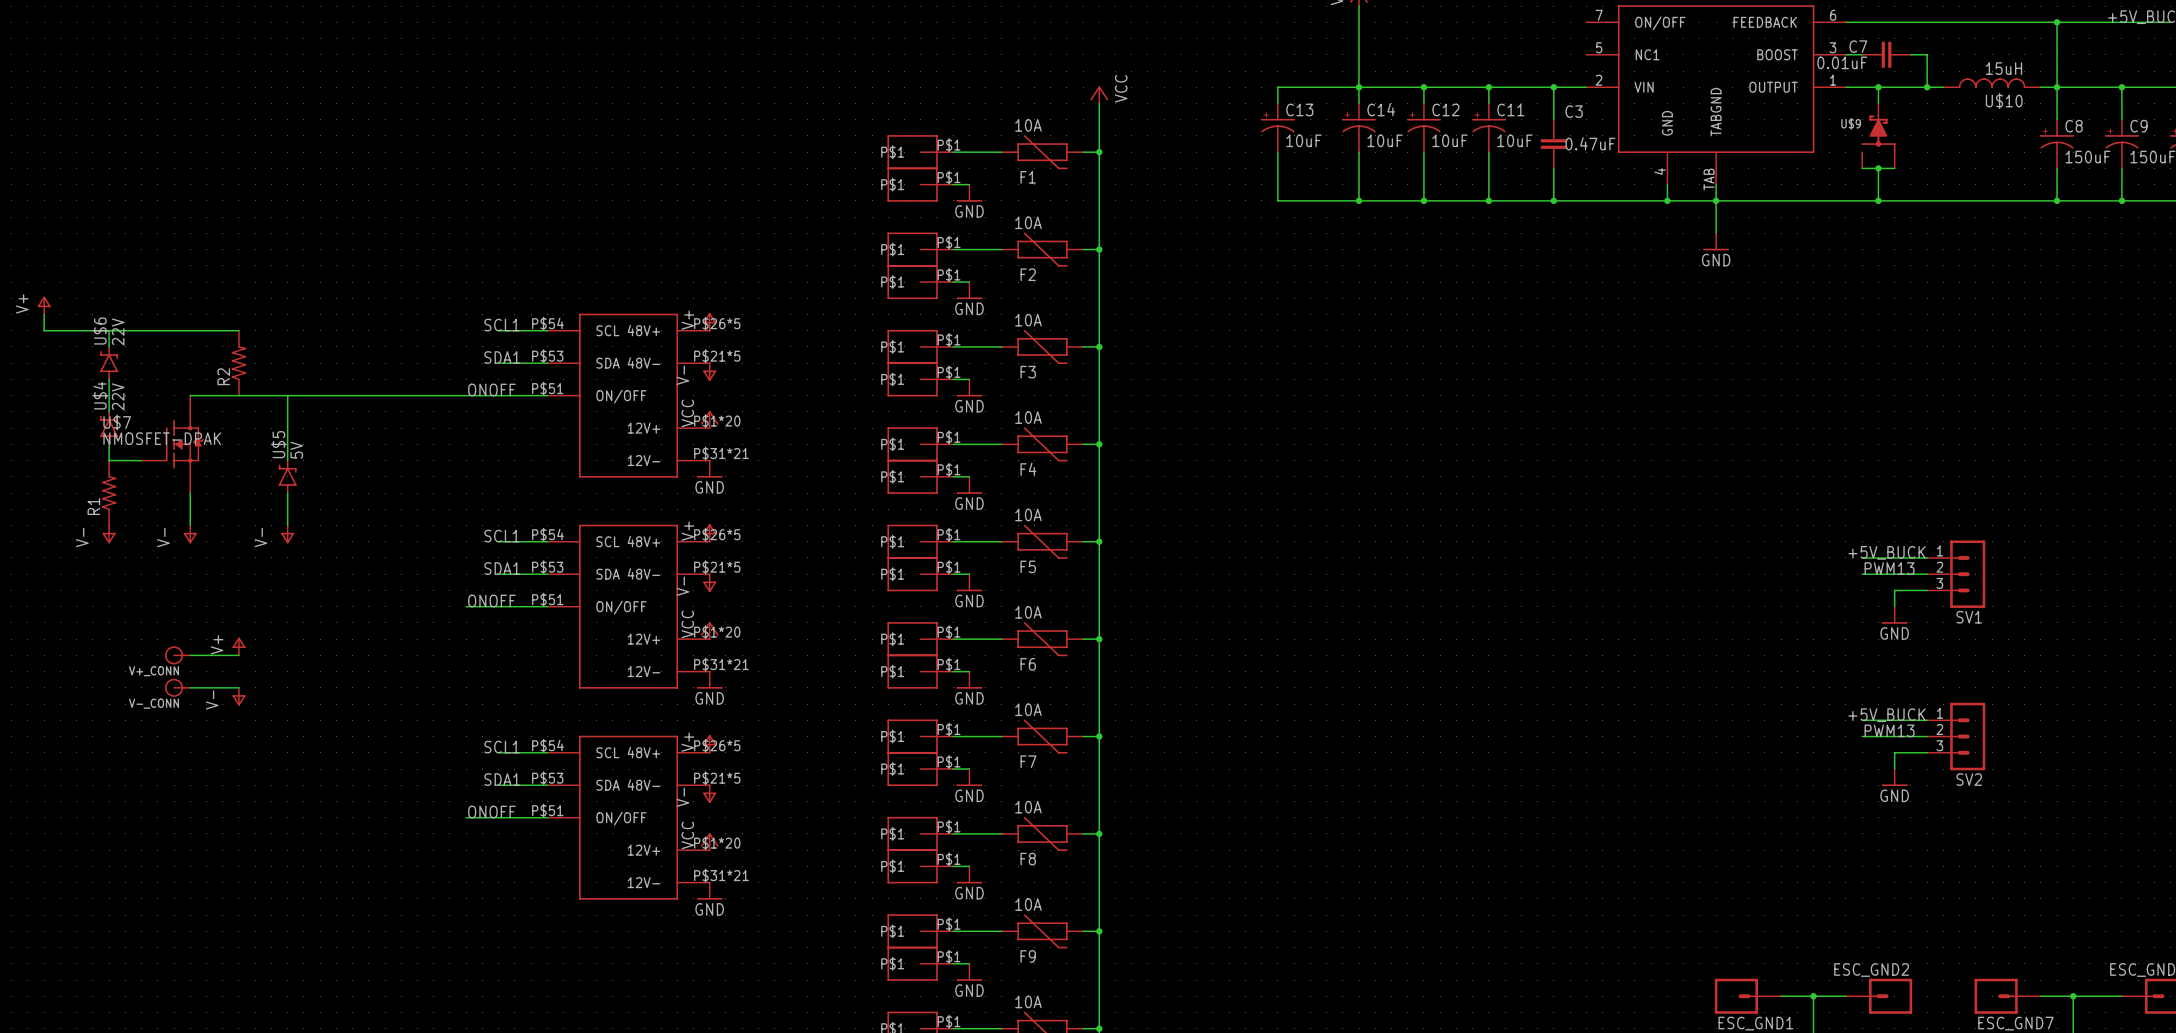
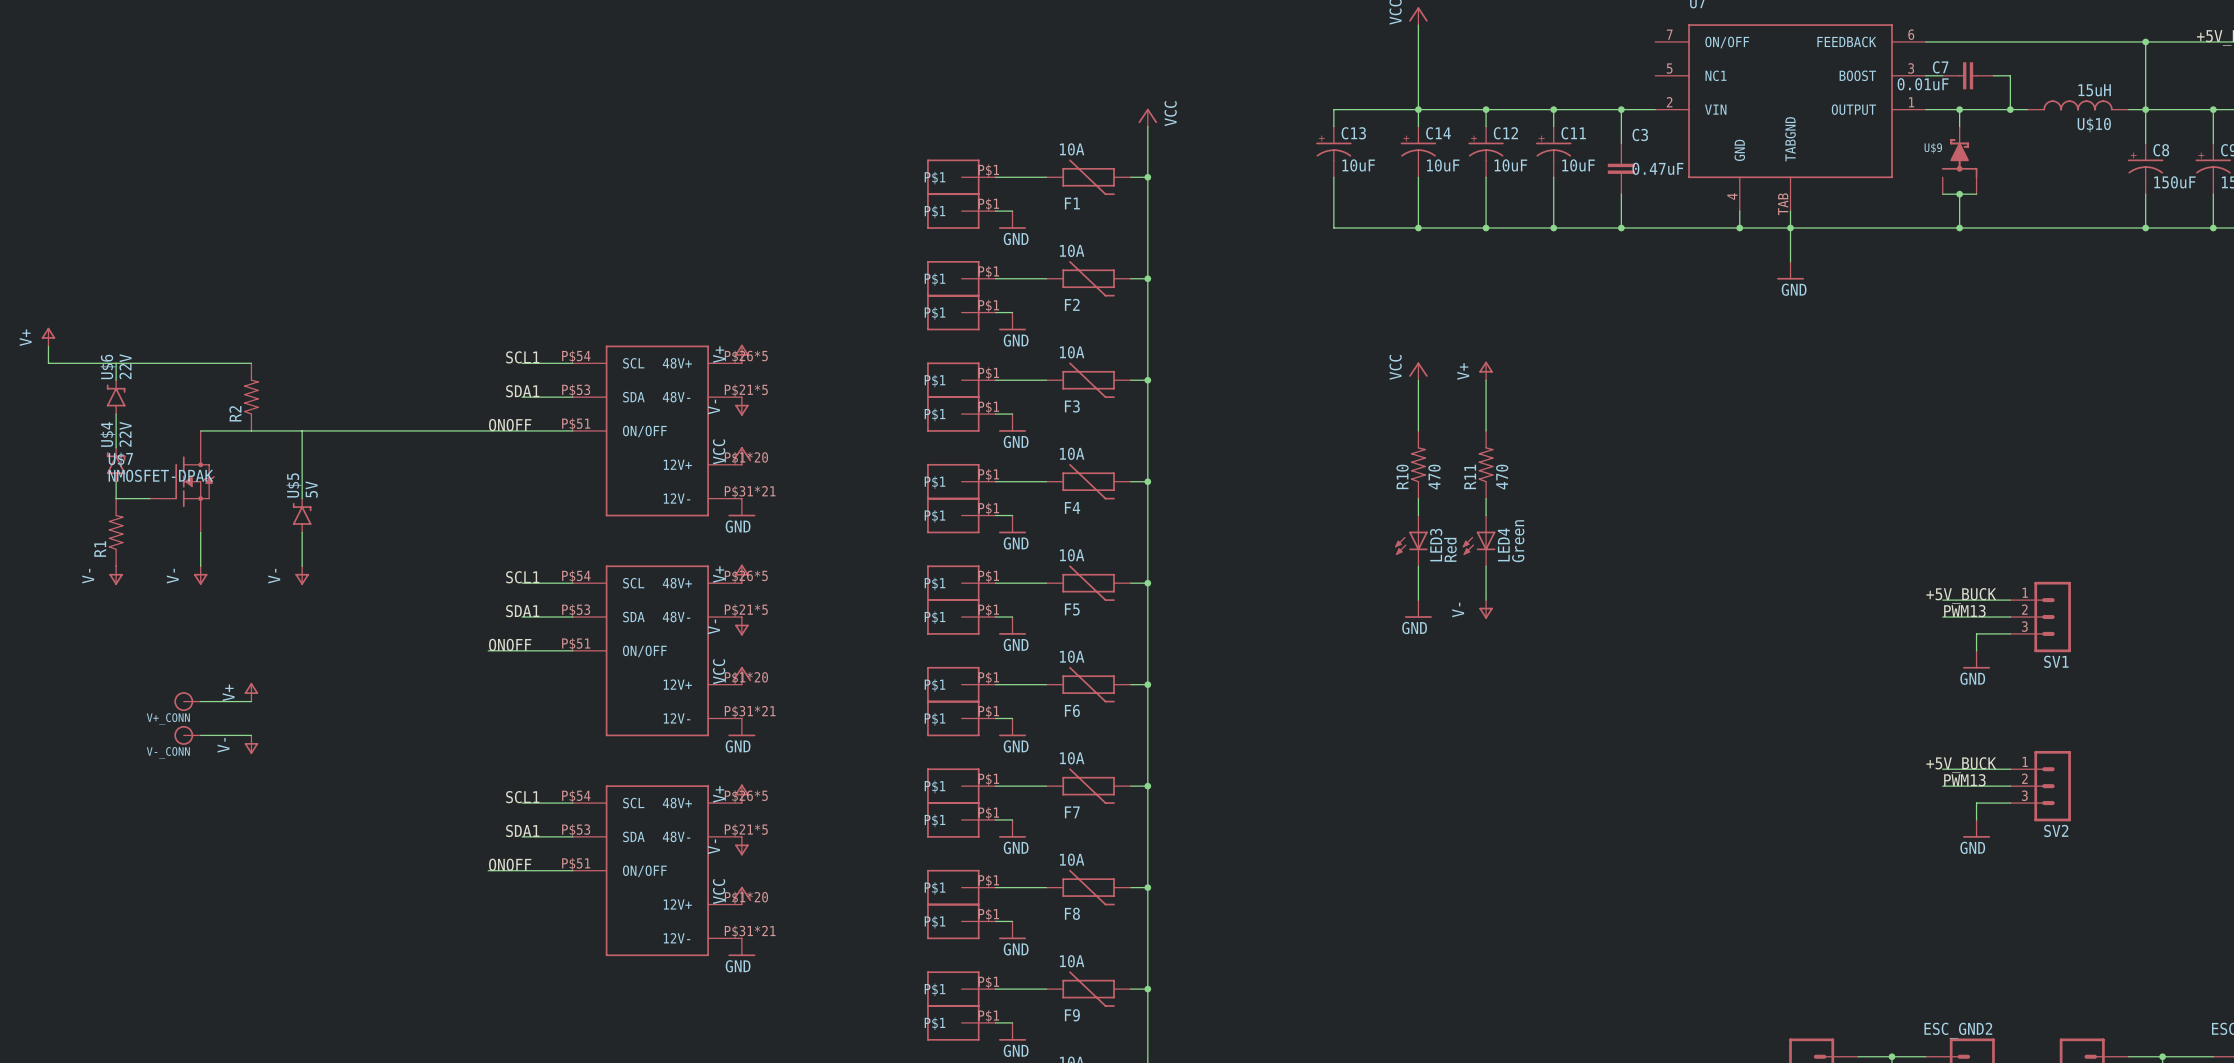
power symbol: none -> VCC (1418, 371)
power symbol: none -> V+ (1486, 370)
wire: none -> (1418, 380) (1418, 430)
wire: none -> (1486, 380) (1486, 430)
R10: none -> 470 (1418, 464)
R11: none -> 470 (1486, 464)
wire: none -> (1418, 498) (1418, 515)
wire: none -> (1486, 498) (1486, 515)
LED3: none -> Red (1411, 540)
LED4: none -> Green (1479, 540)
wire: none -> (1418, 566) (1418, 600)
wire: none -> (1486, 566) (1486, 600)
power symbol: none -> GND (1418, 608)
power symbol: none -> V- (1486, 609)

